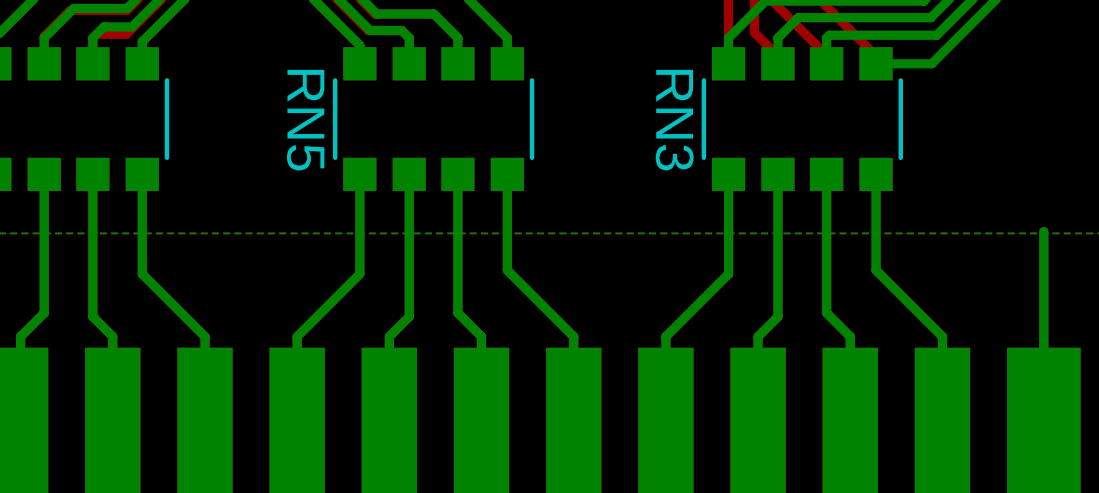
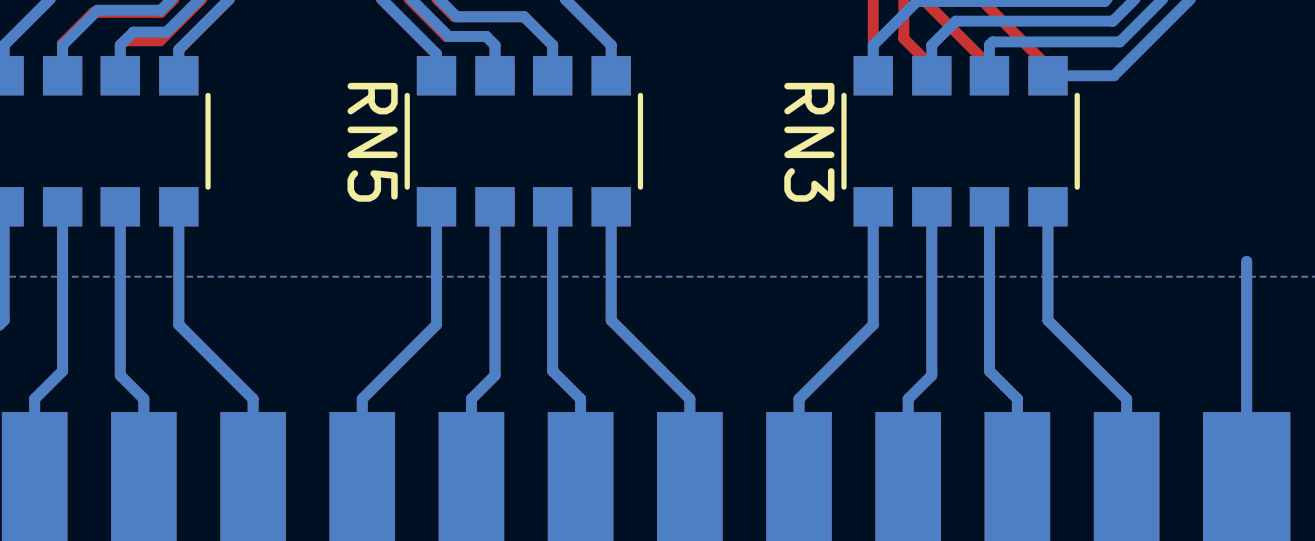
bottom track: none -> (1246, 261) (1246, 274)

